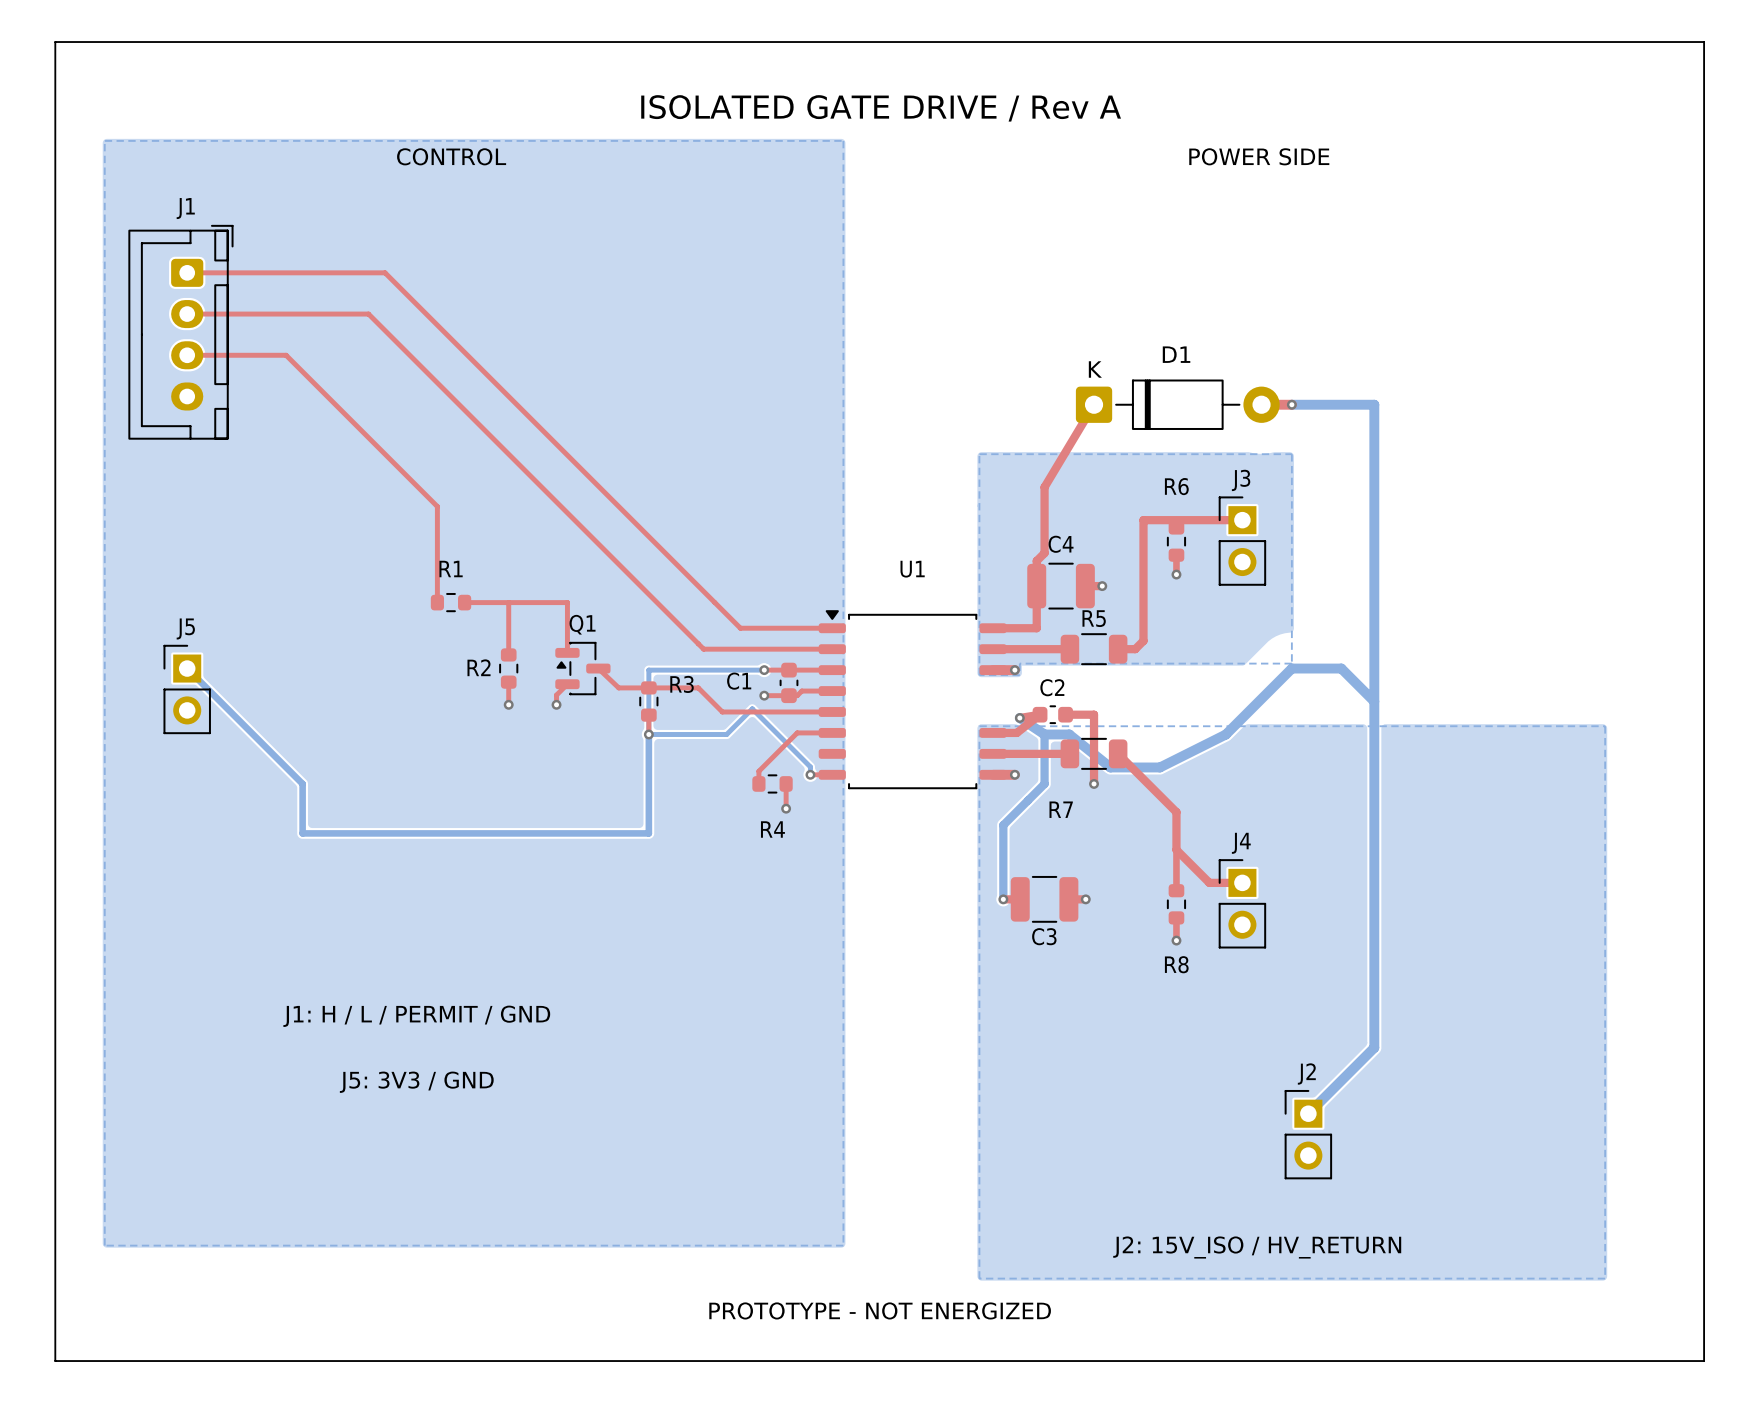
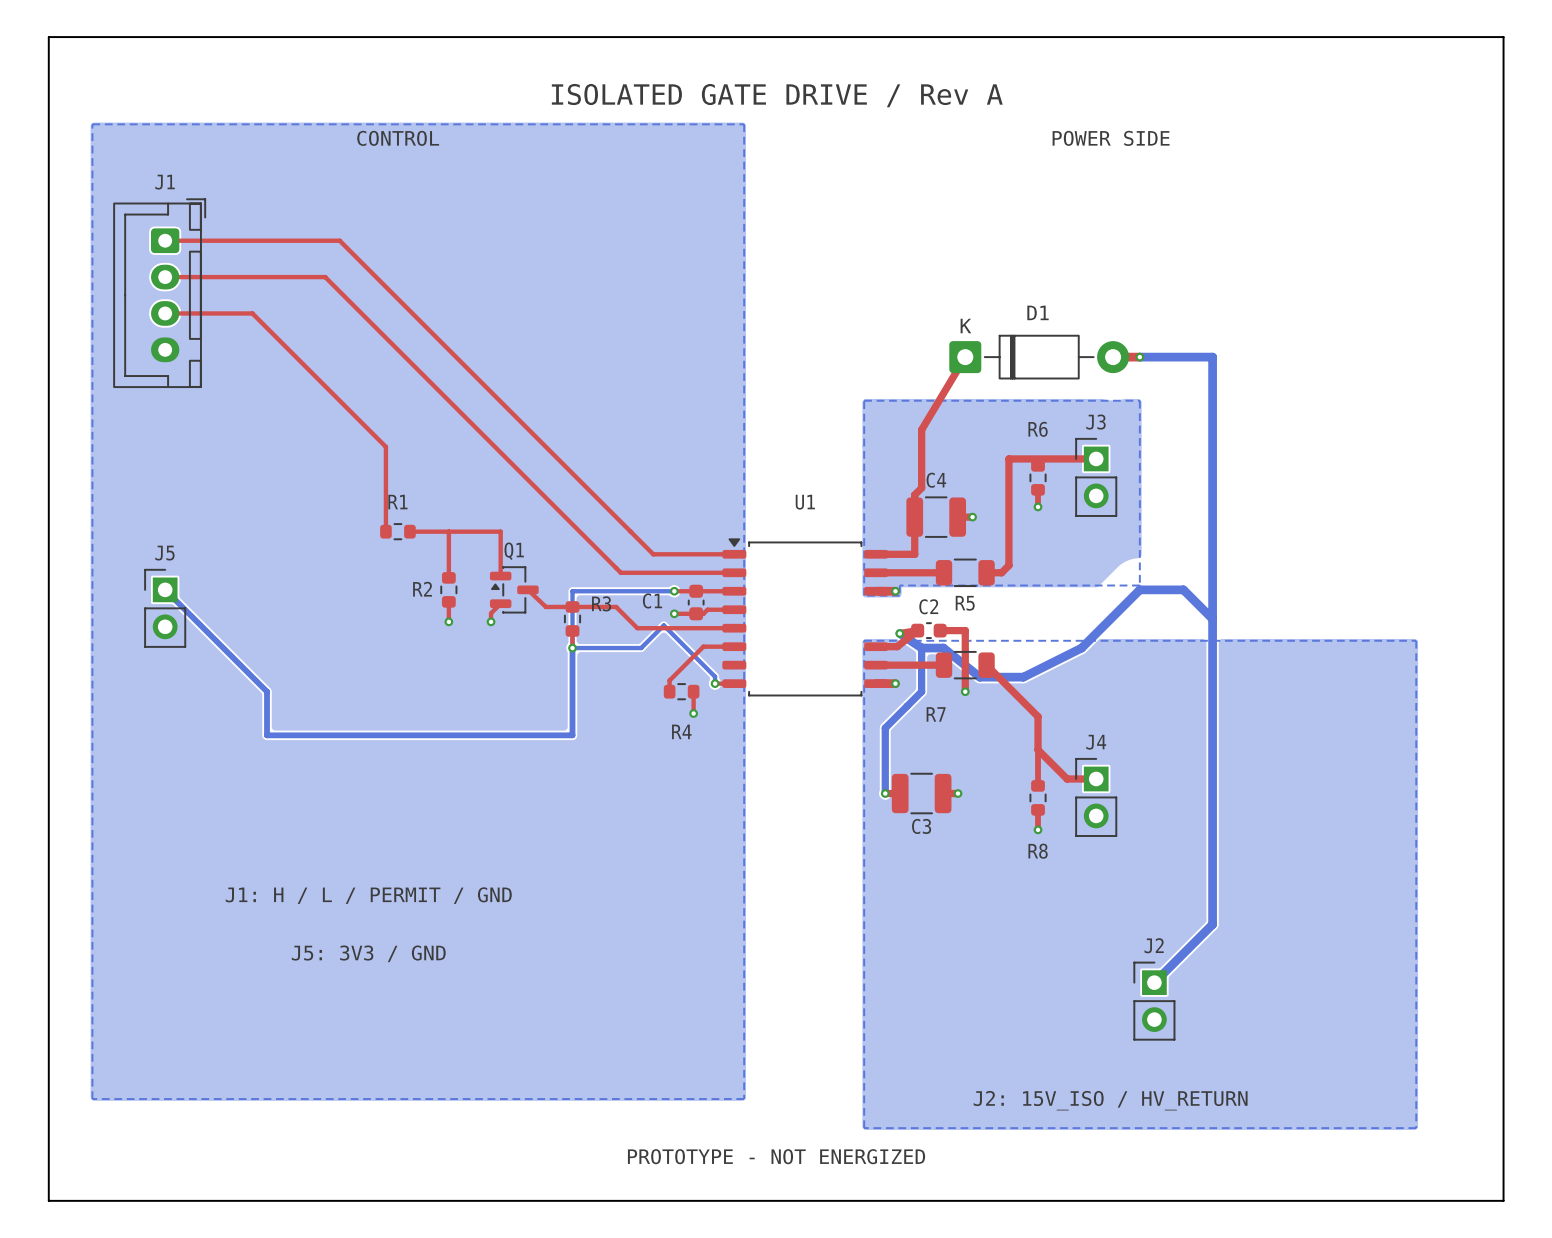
R5 name position: R5 (1094, 618) -> R5 (965, 603)

